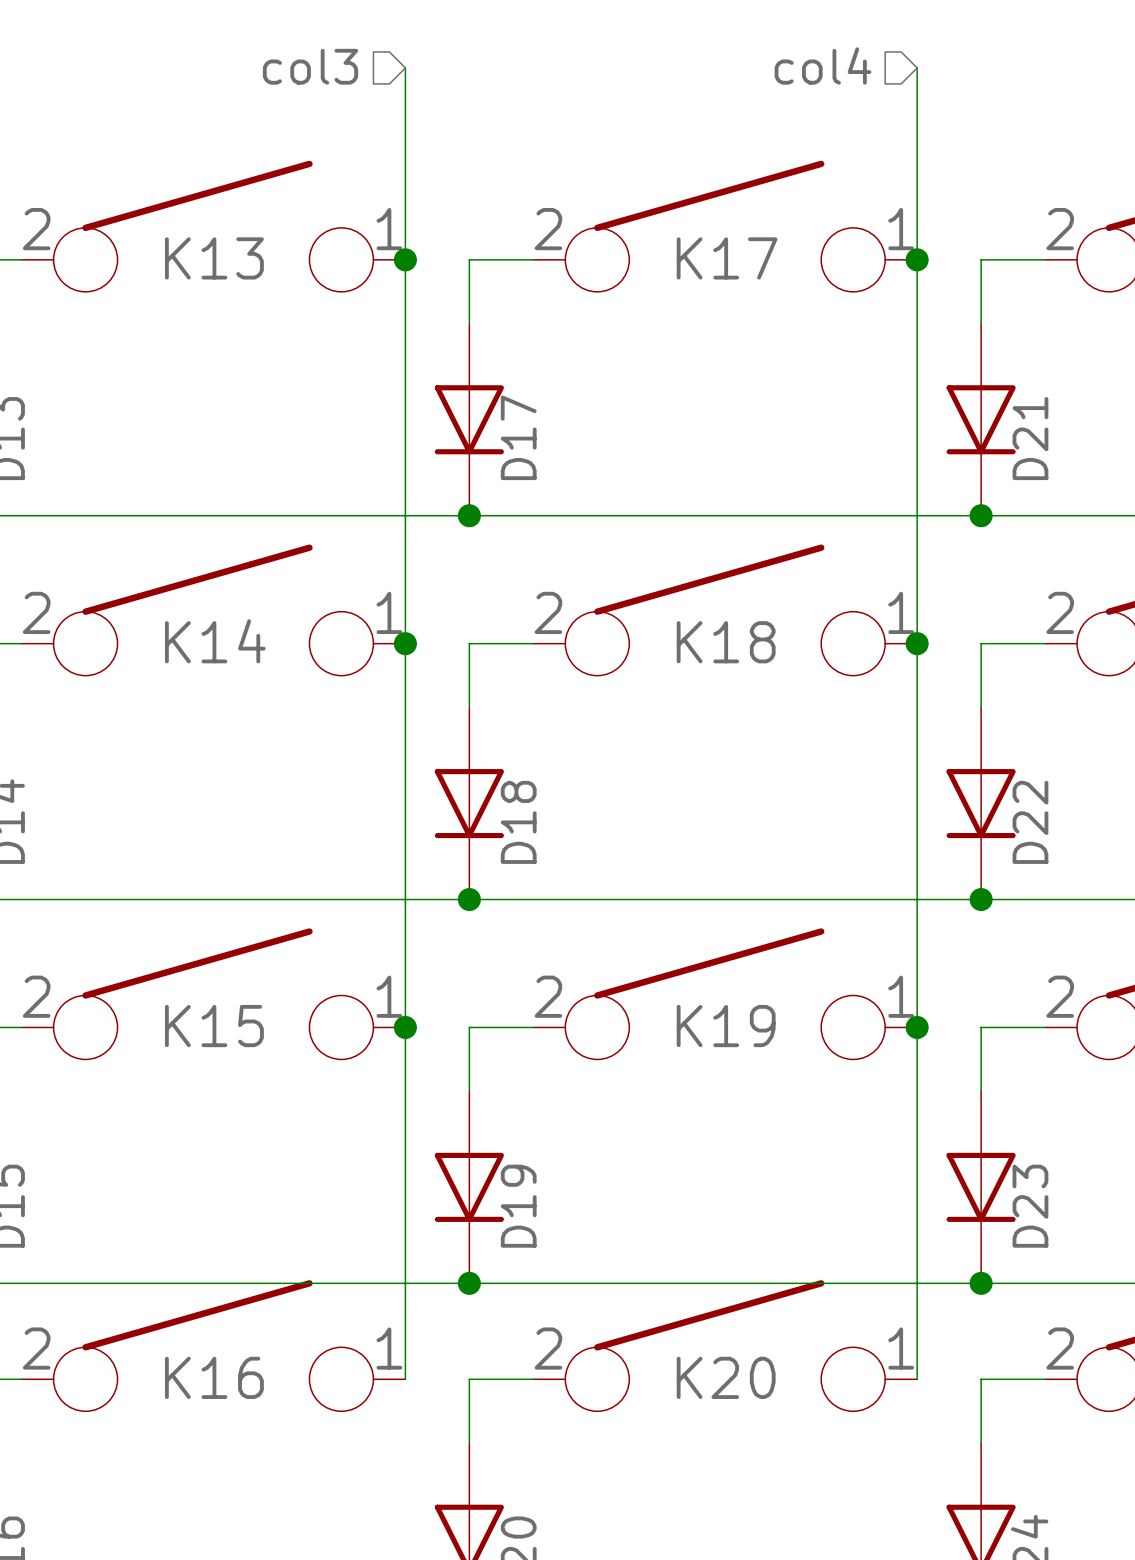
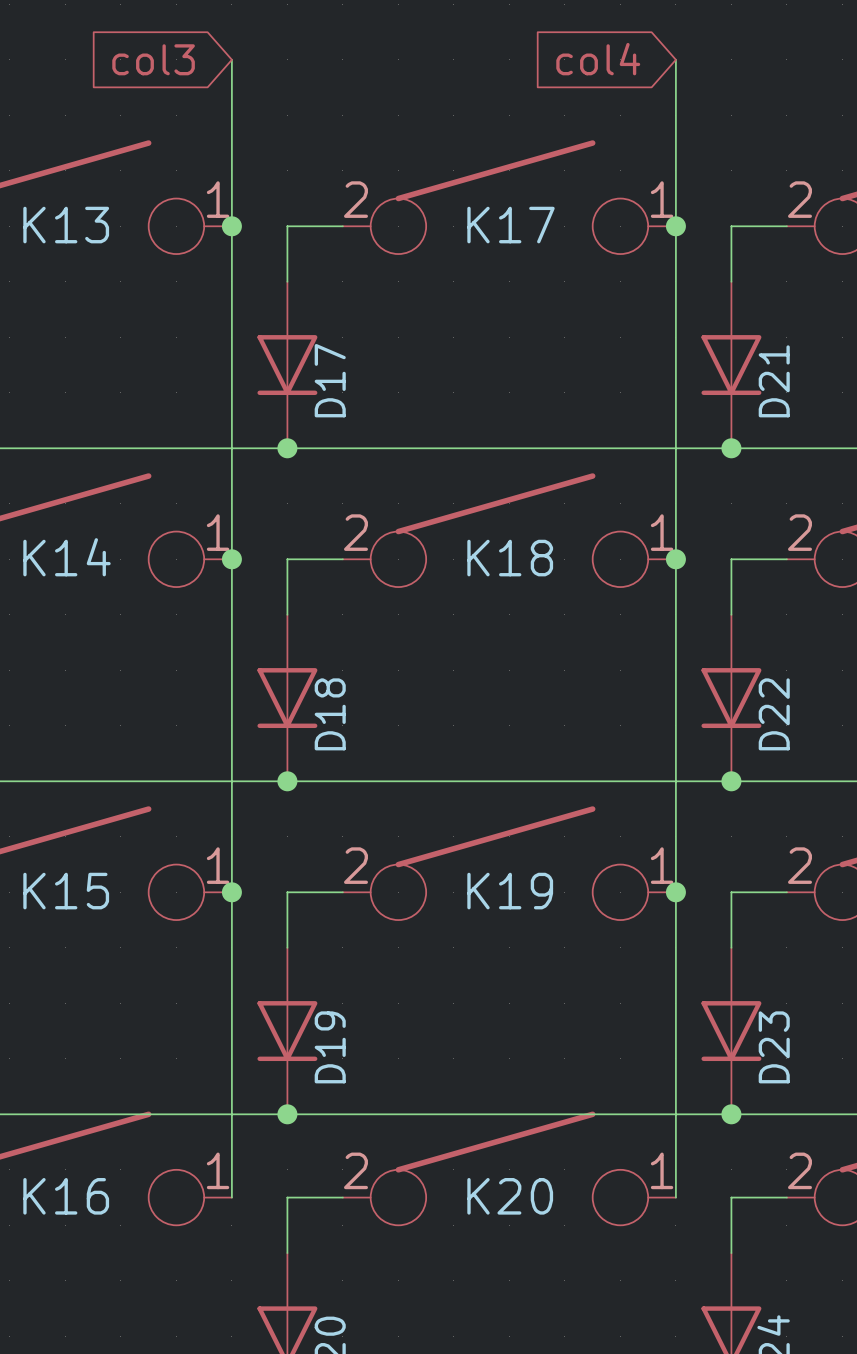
hierarchical label: col4 (822, 65) -> none
hierarchical label: col3 (310, 66) -> none
global label: none -> col3 (153, 59)
global label: none -> col4 (598, 59)

